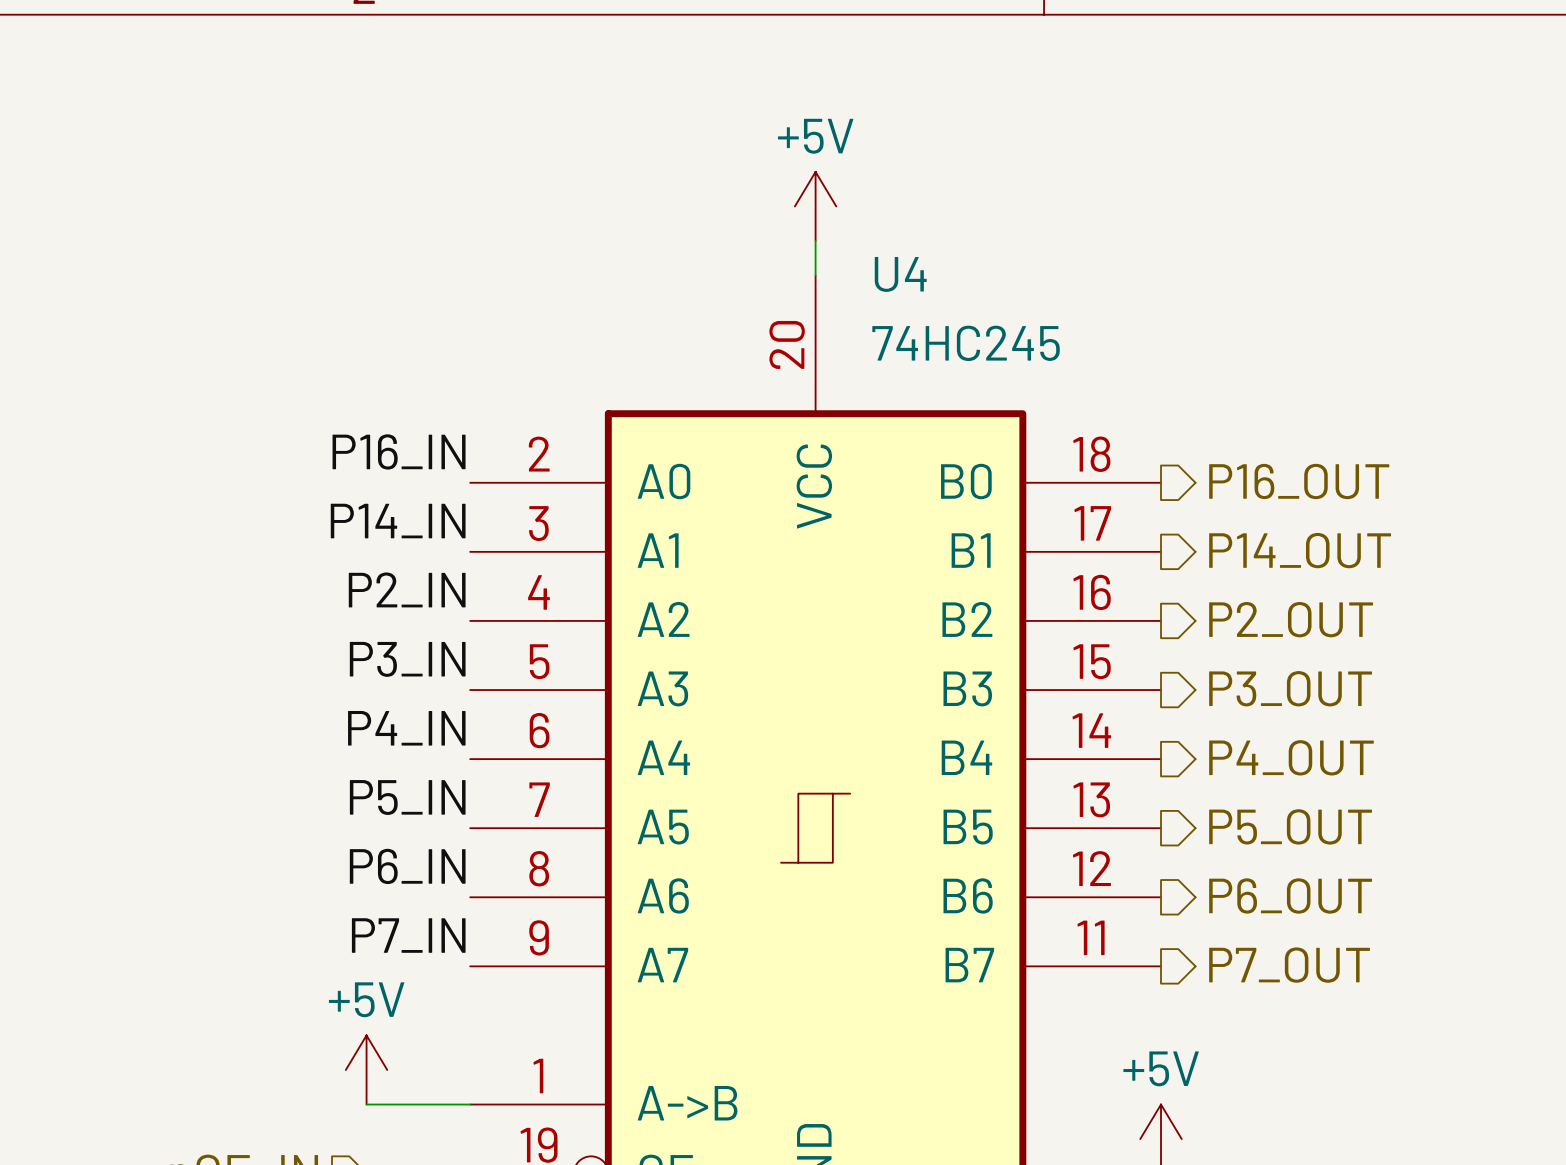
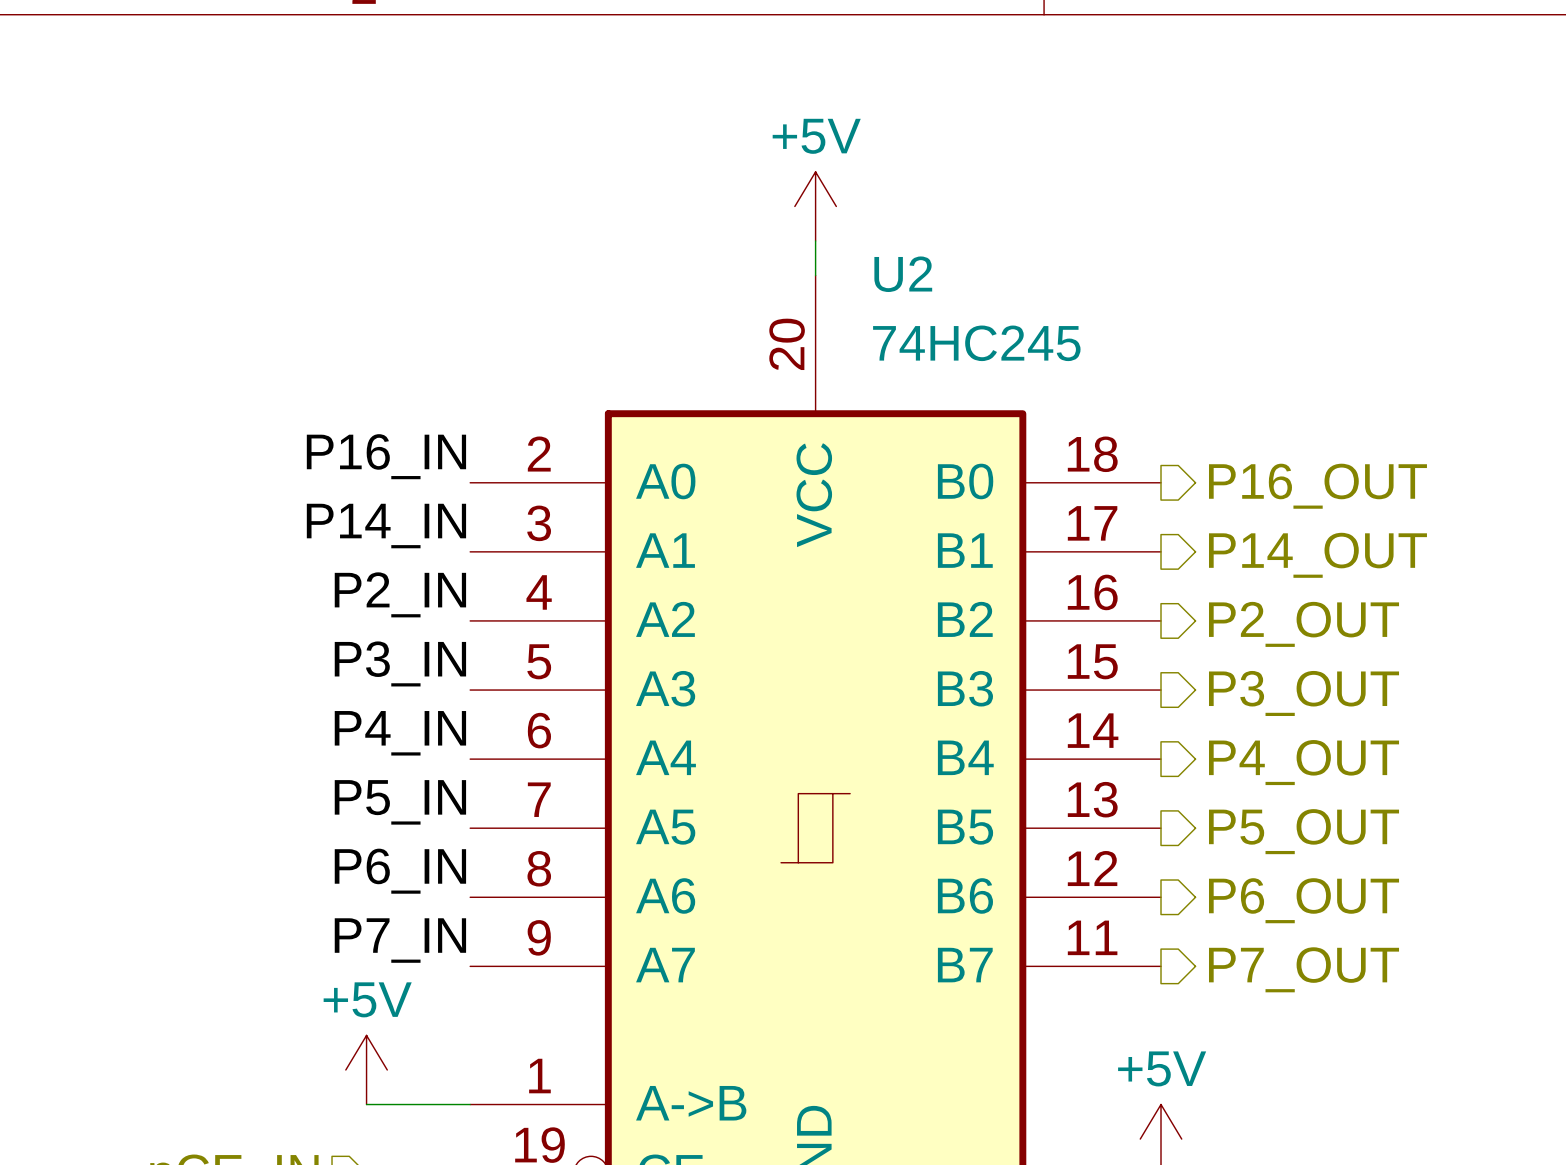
U4 name: U4 (900, 274) -> U2 (903, 274)

